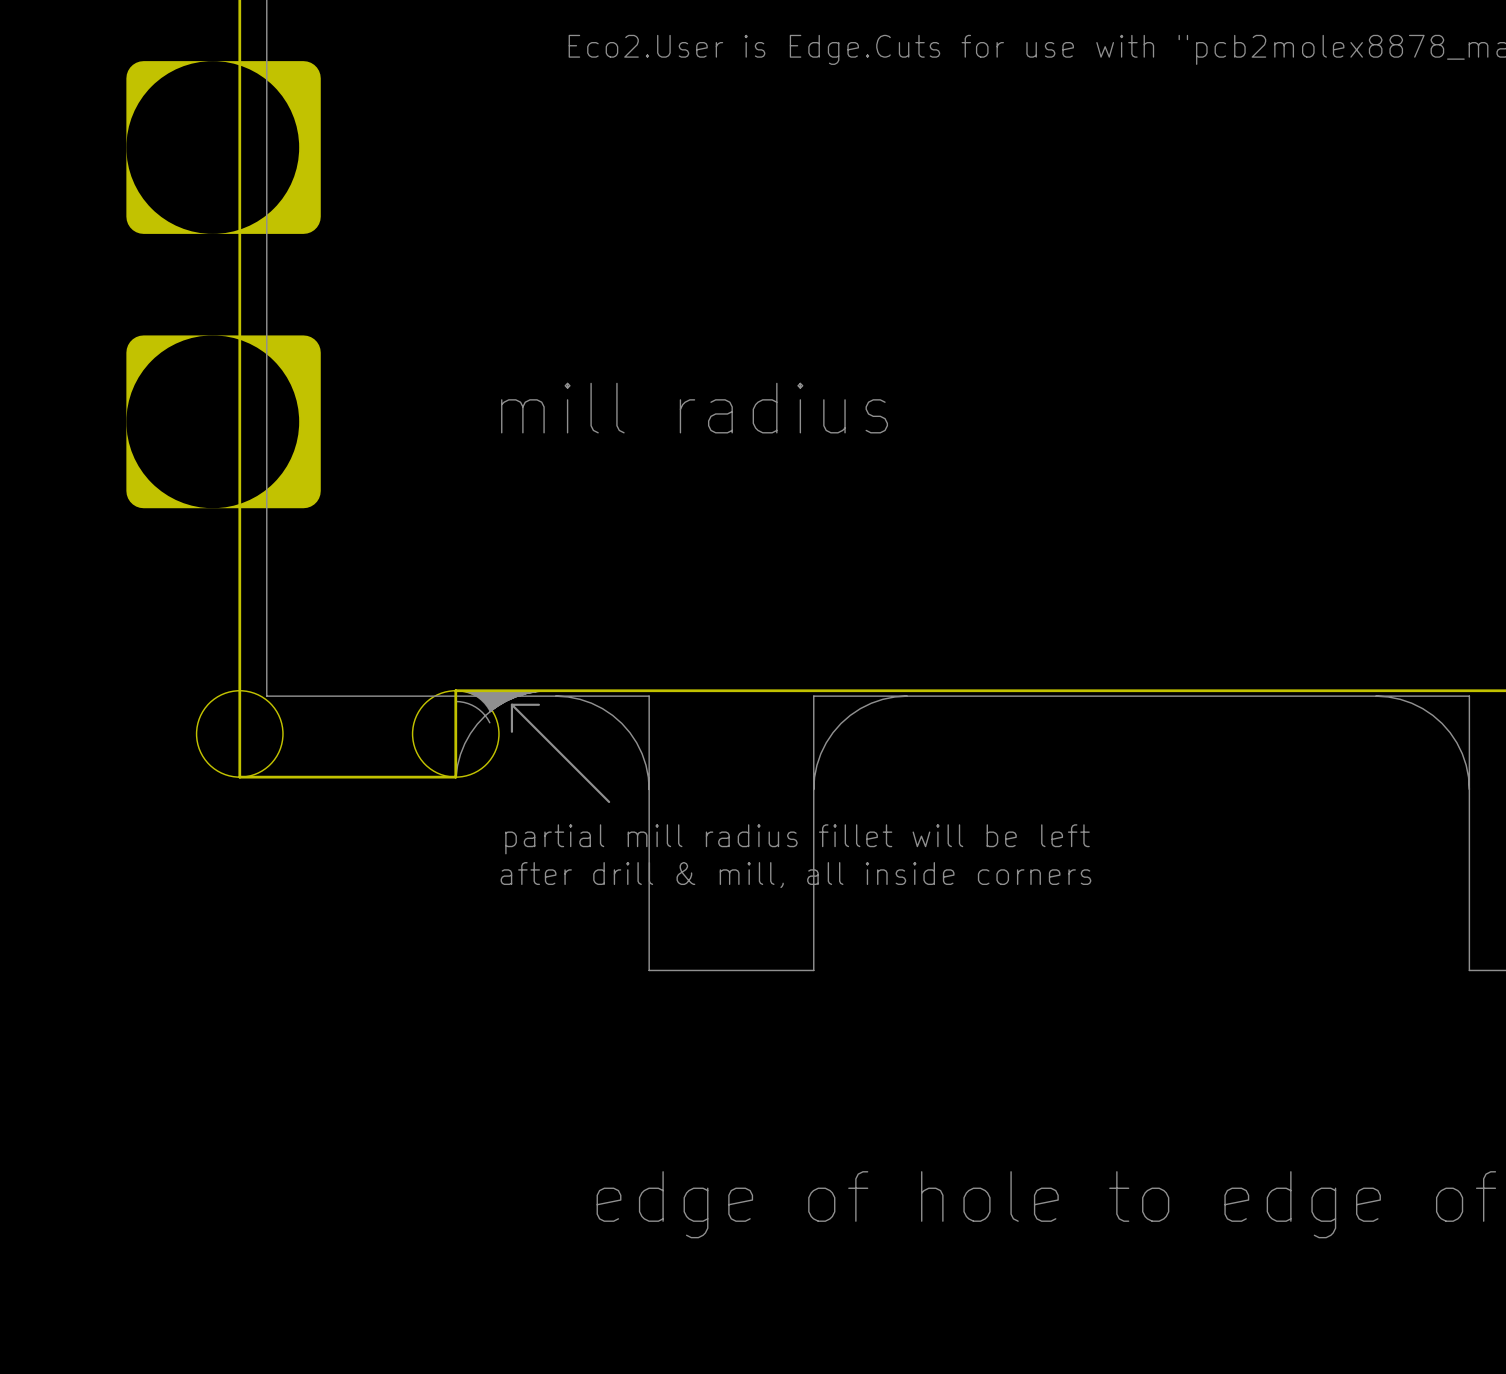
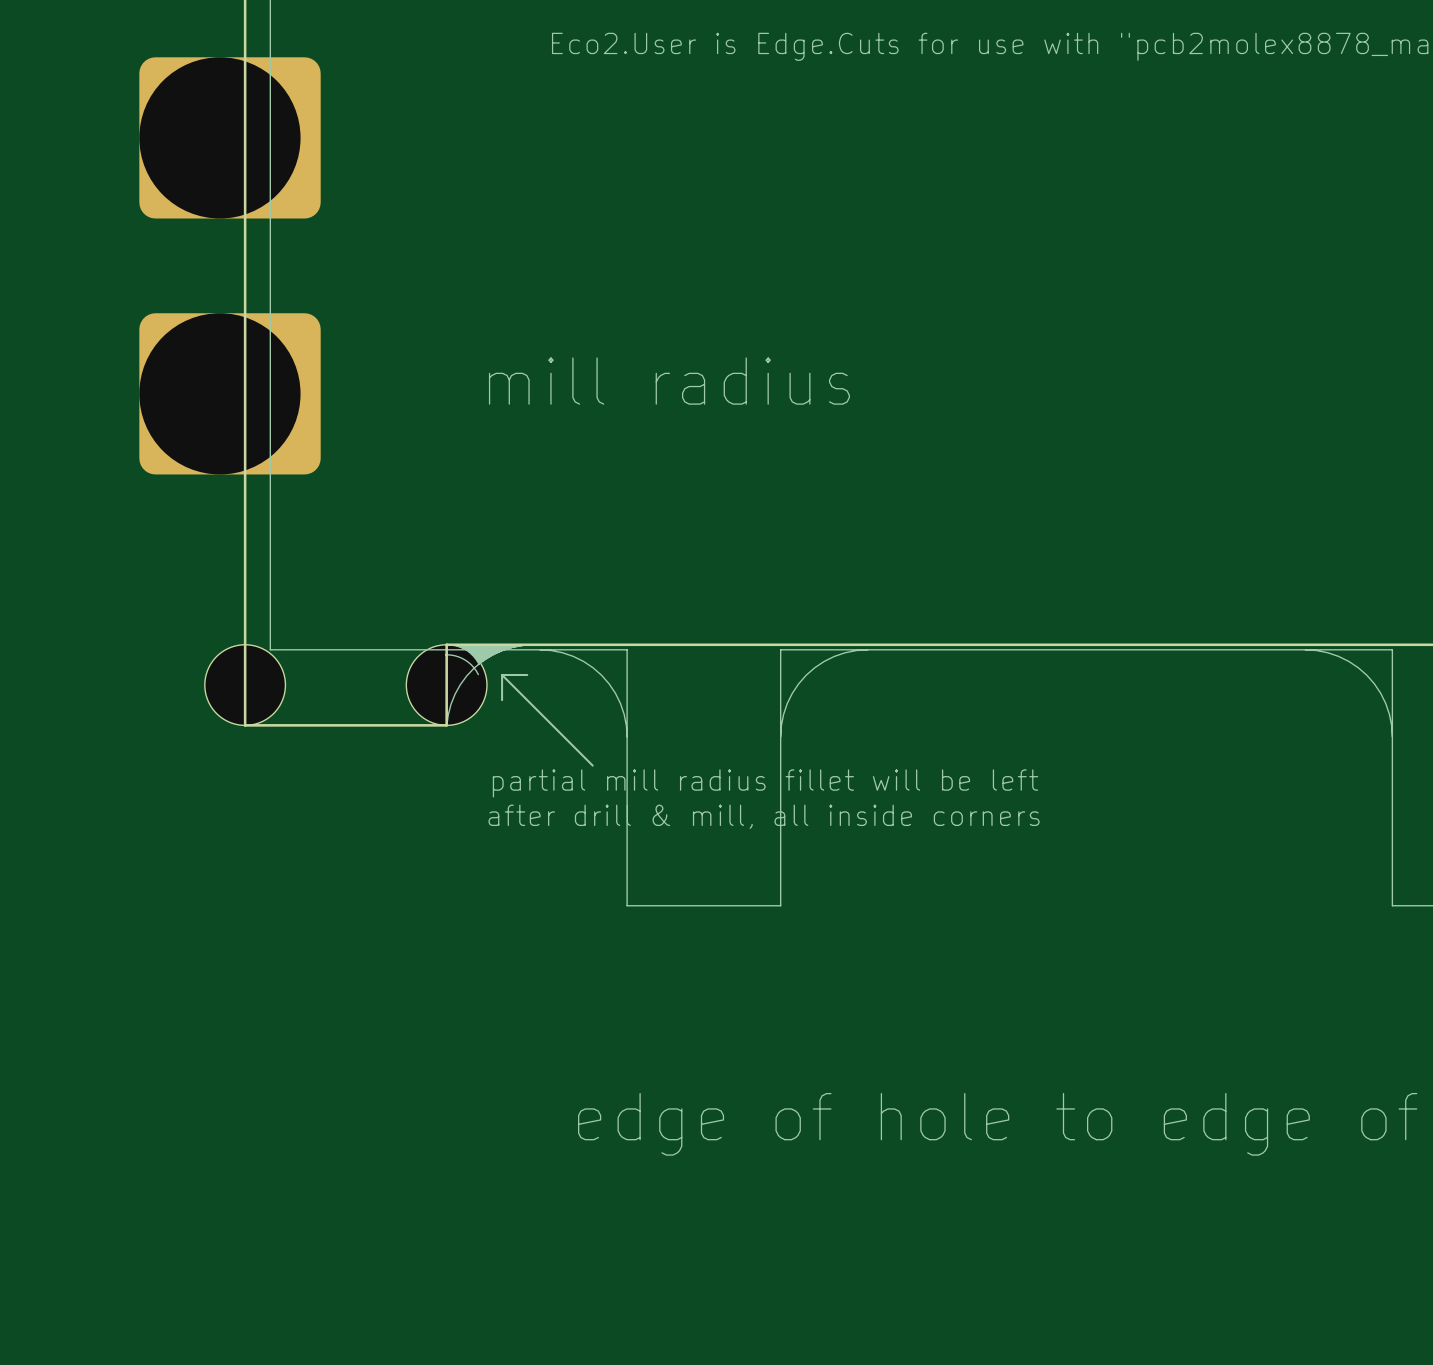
line: (511, 704) (538, 704) -> (502, 674) (527, 674)
line: (511, 704) (511, 731) -> (502, 674) (502, 700)
line: (511, 704) (609, 801) -> (502, 674) (592, 765)

